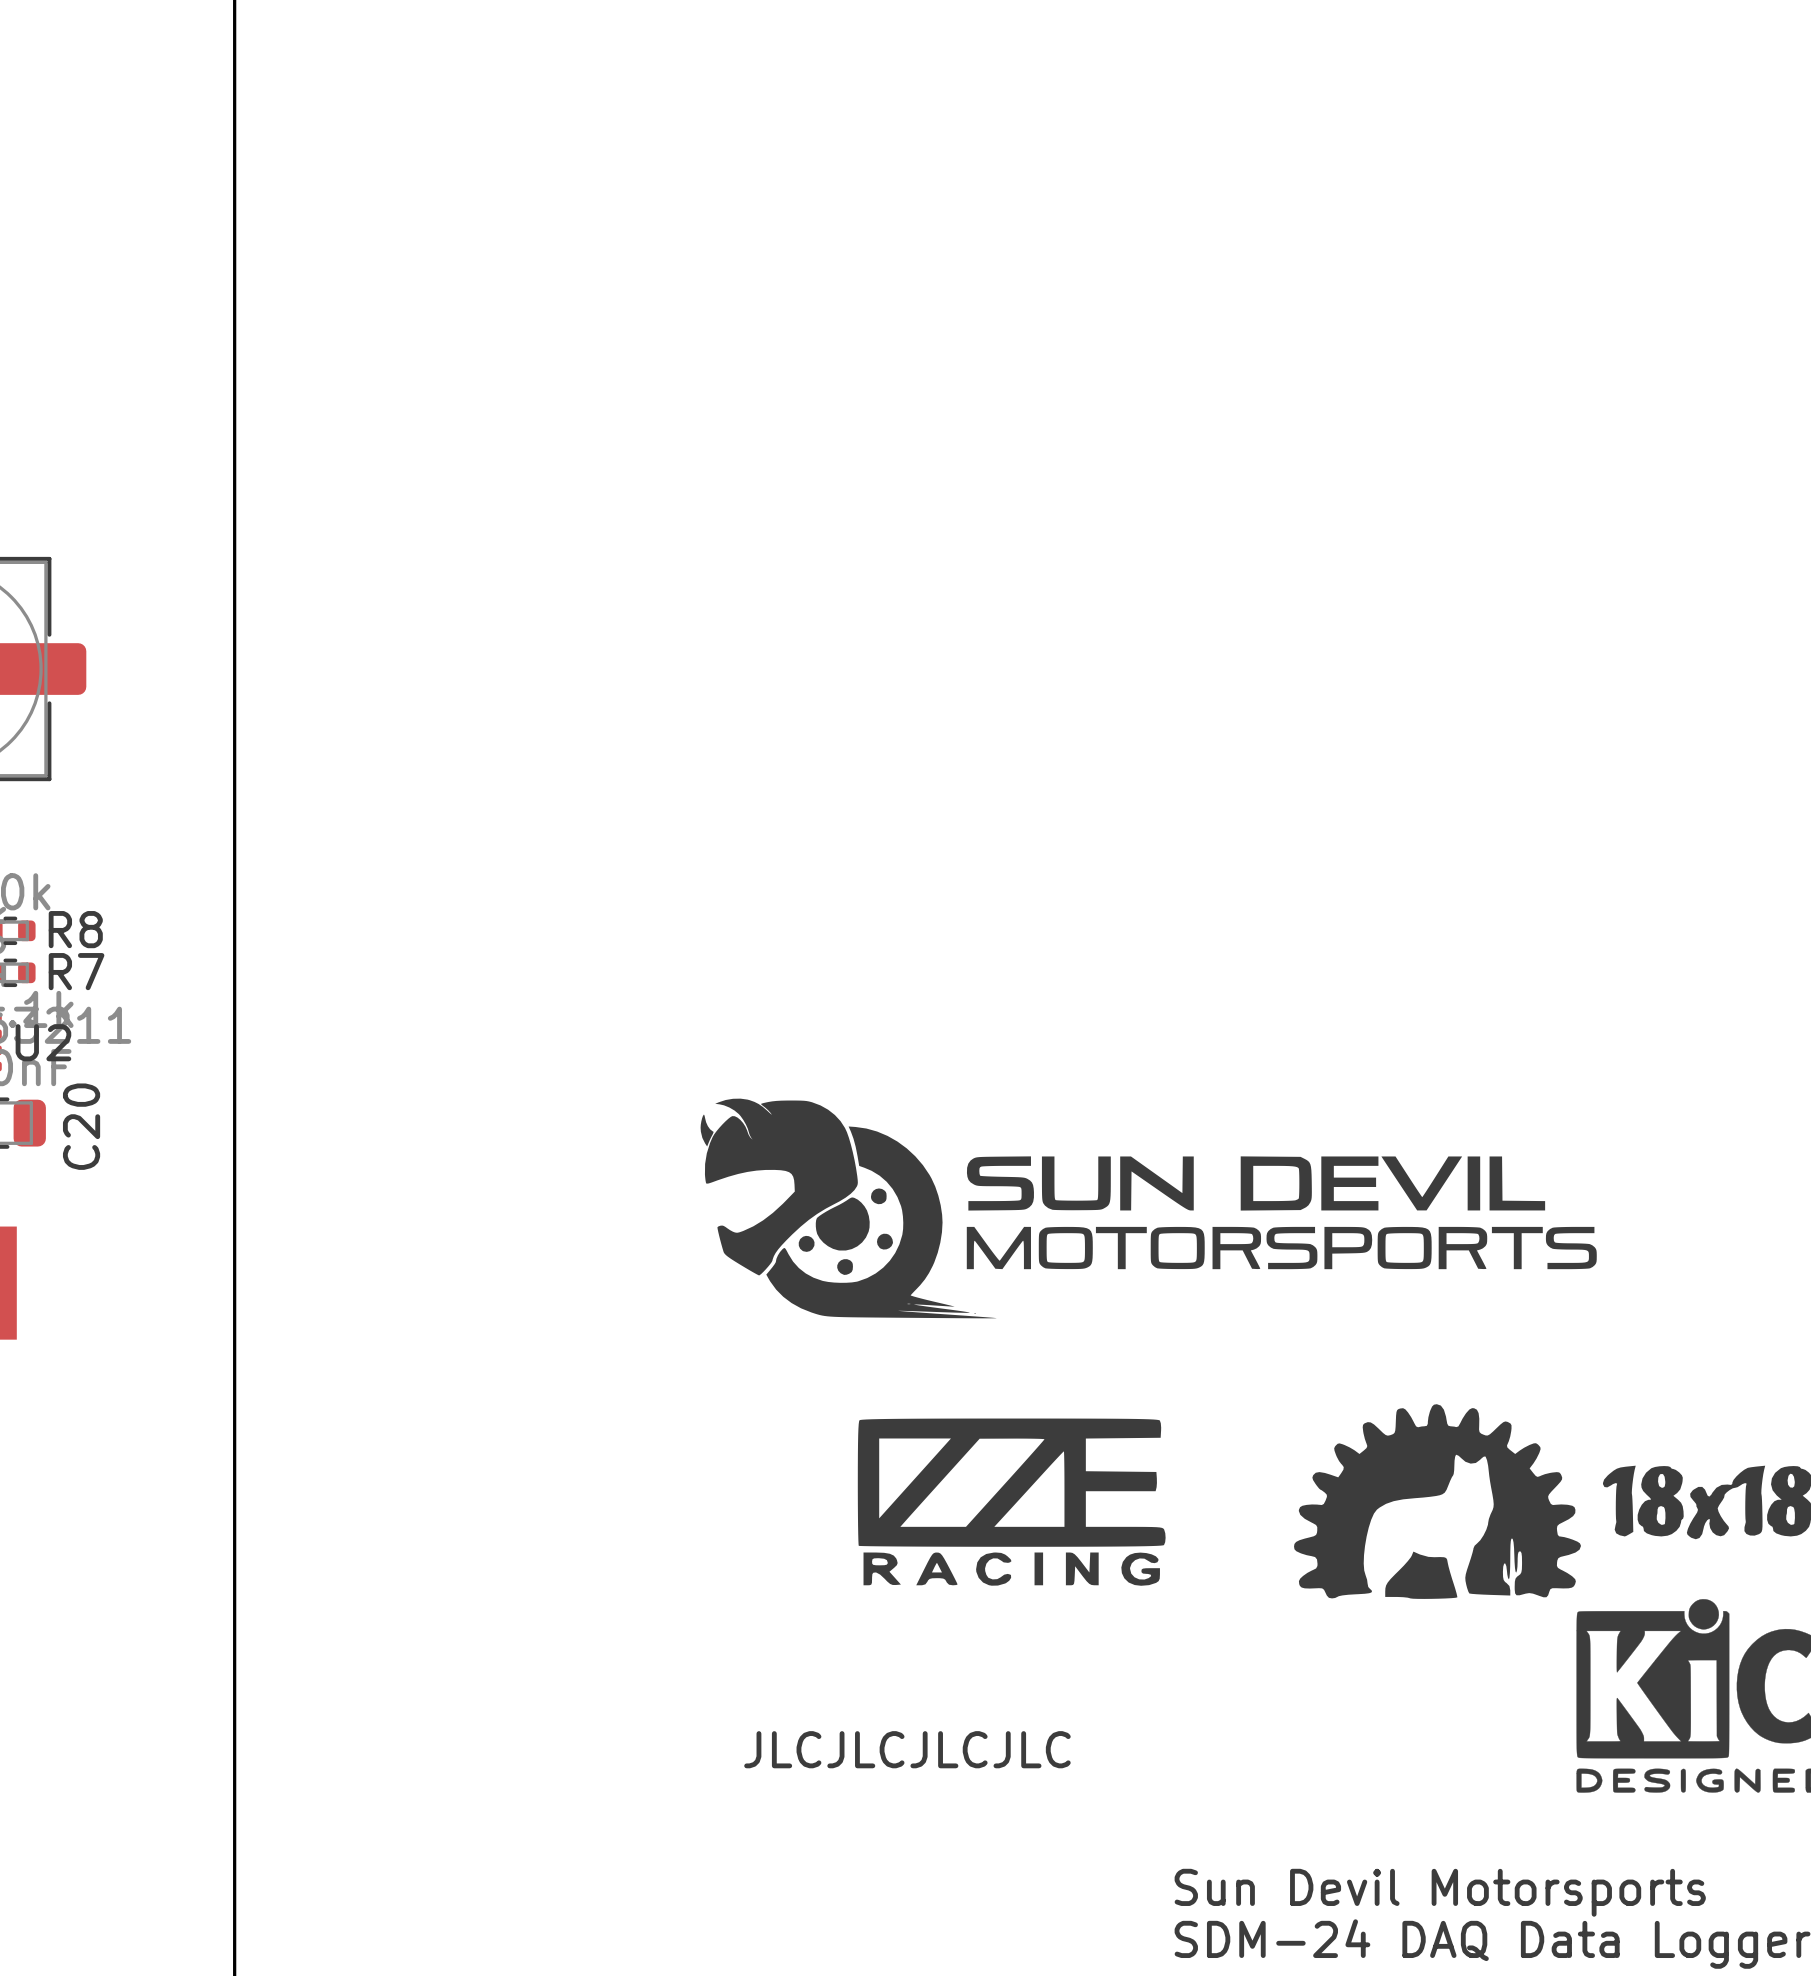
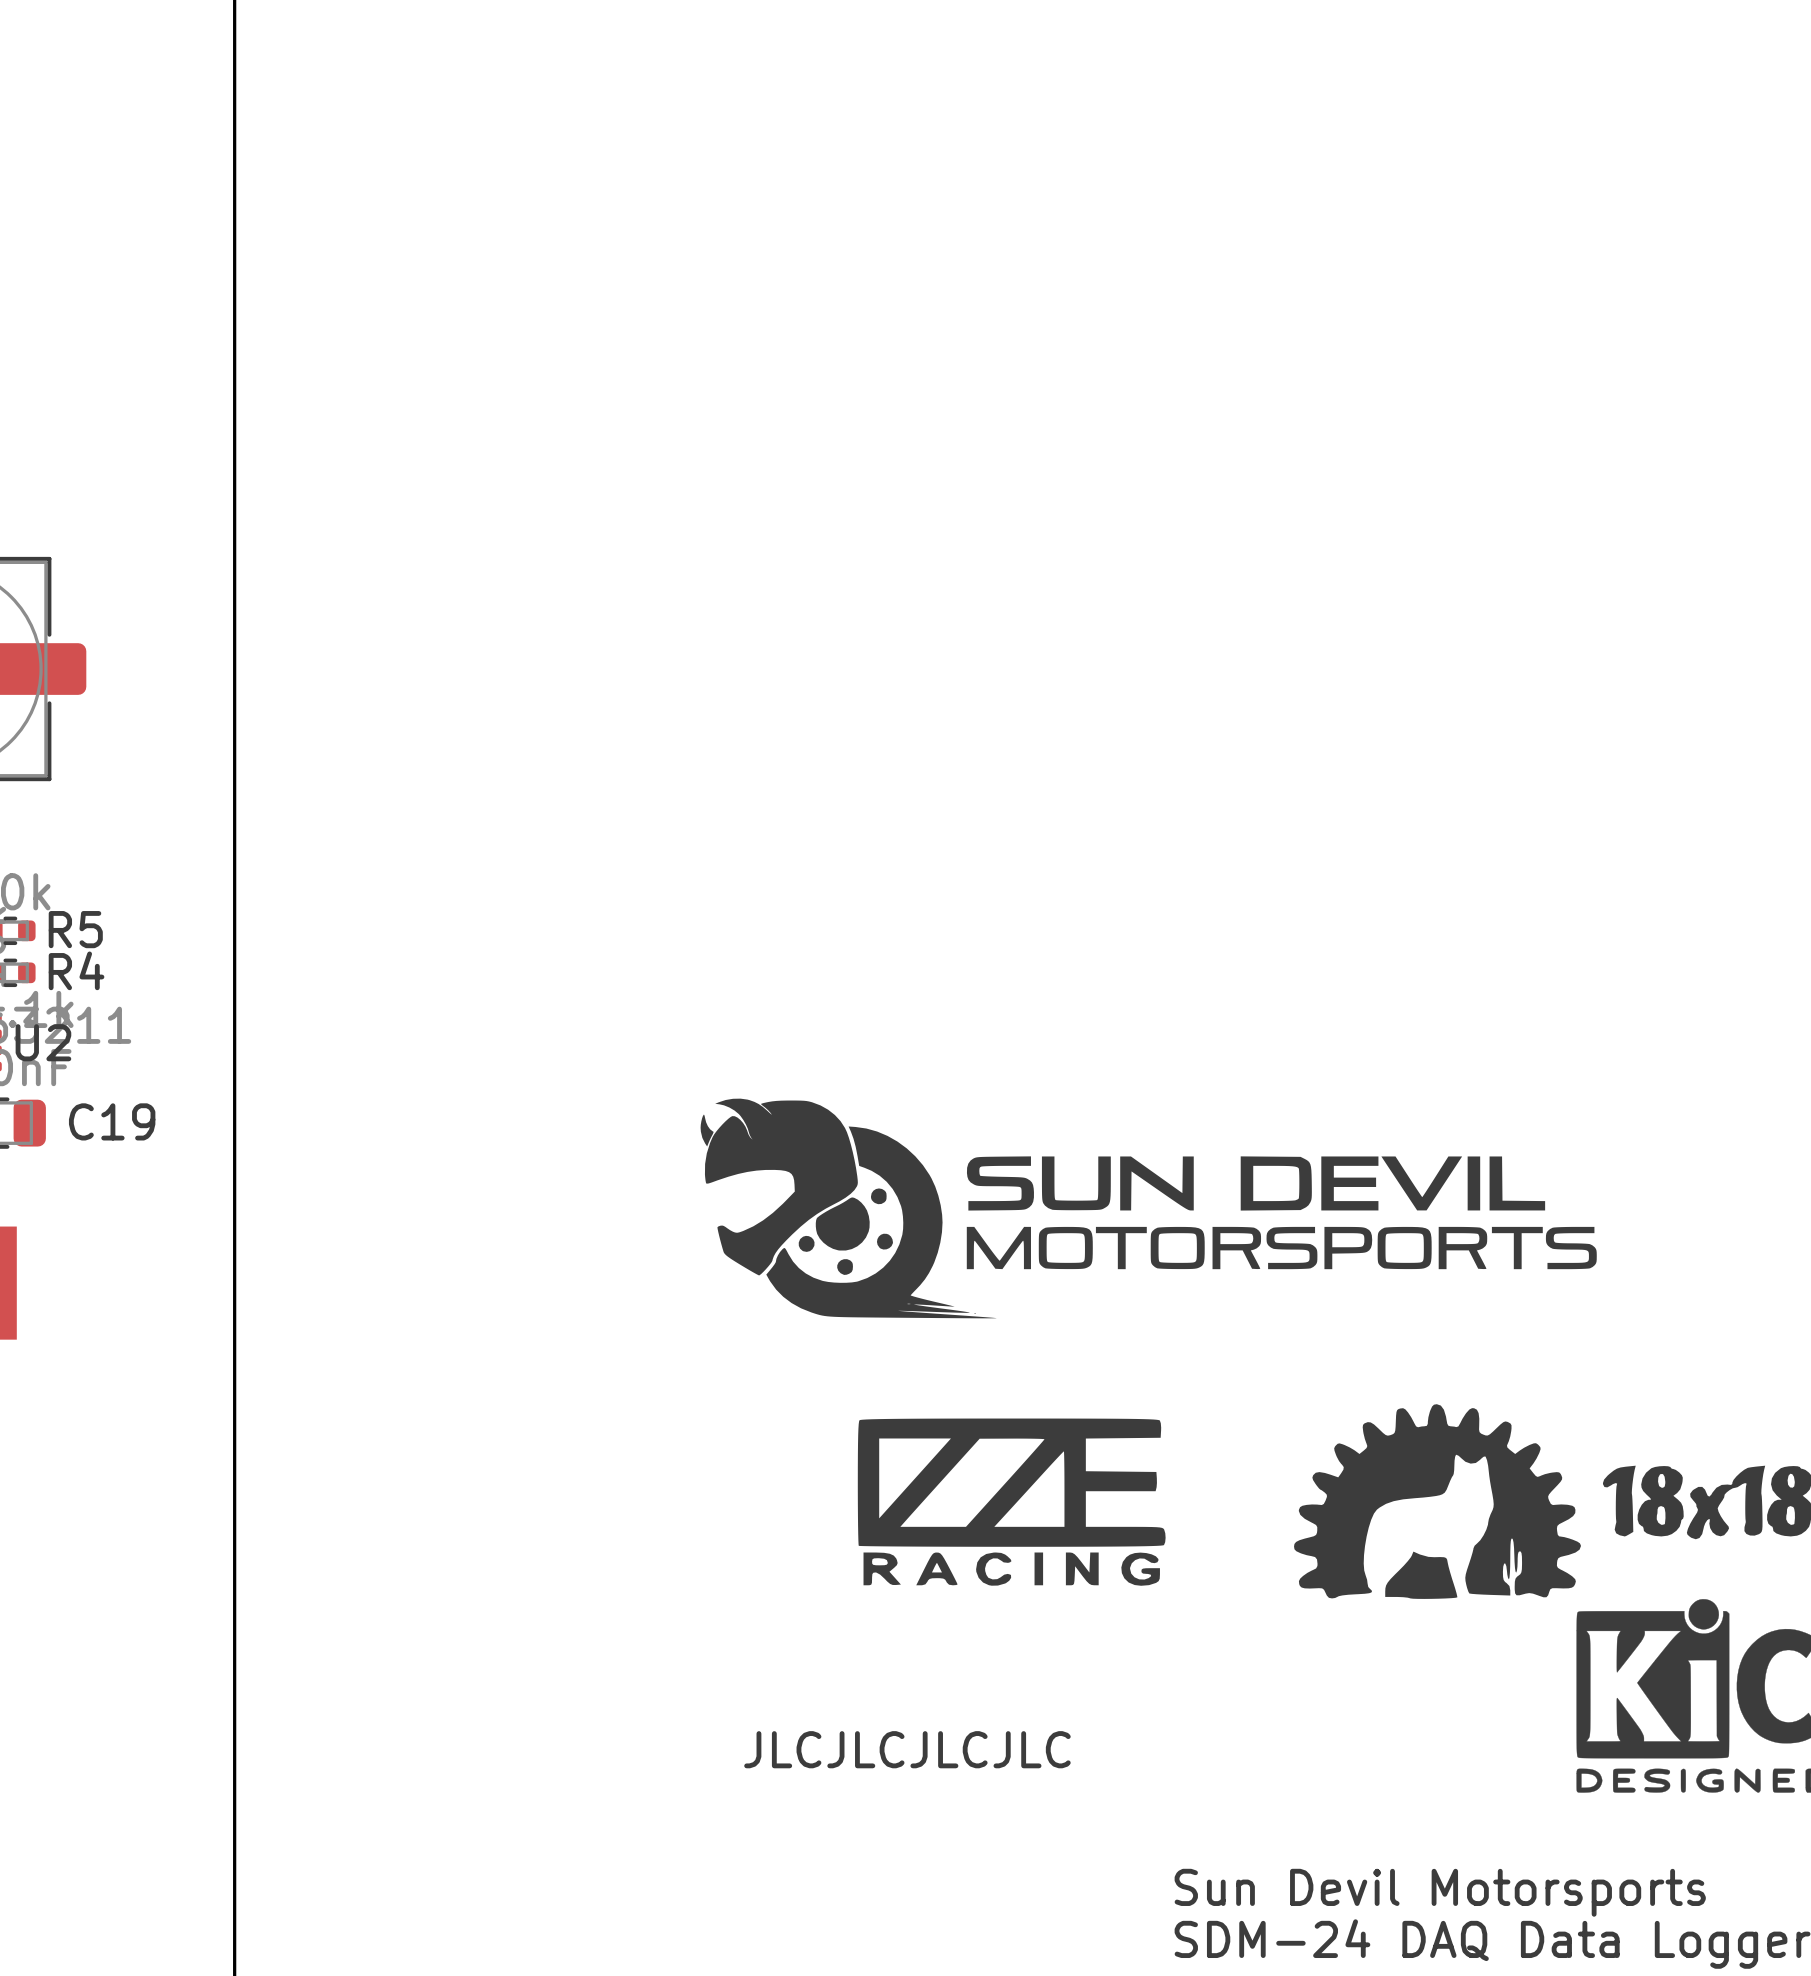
R8 name: R8 (75, 929) -> R5 (75, 929)
R7 name: R7 (76, 971) -> R4 (76, 970)
C20 name: C20 (81, 1126) -> C19 (112, 1121)

